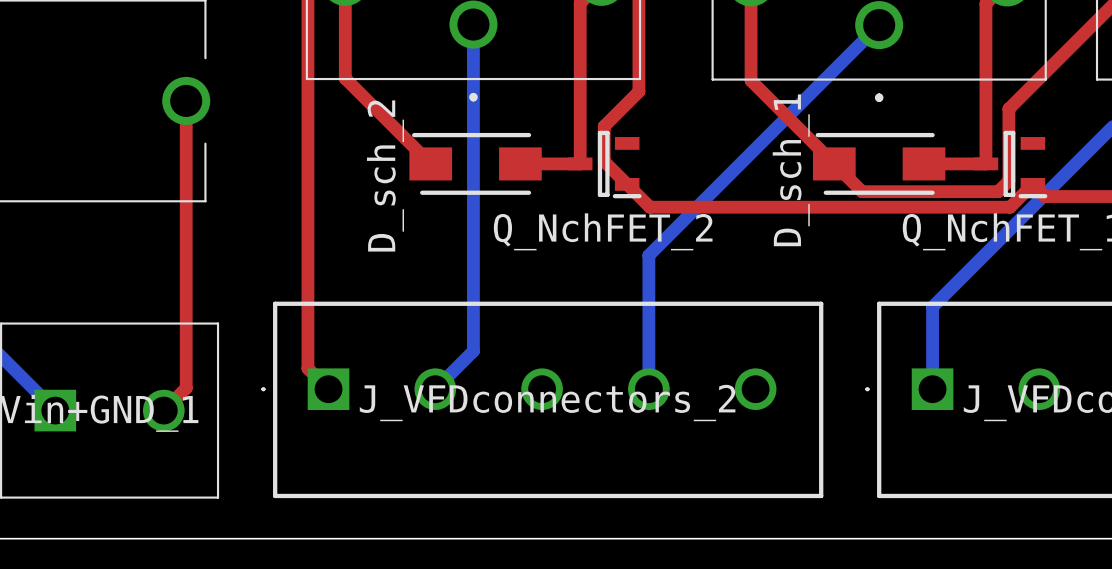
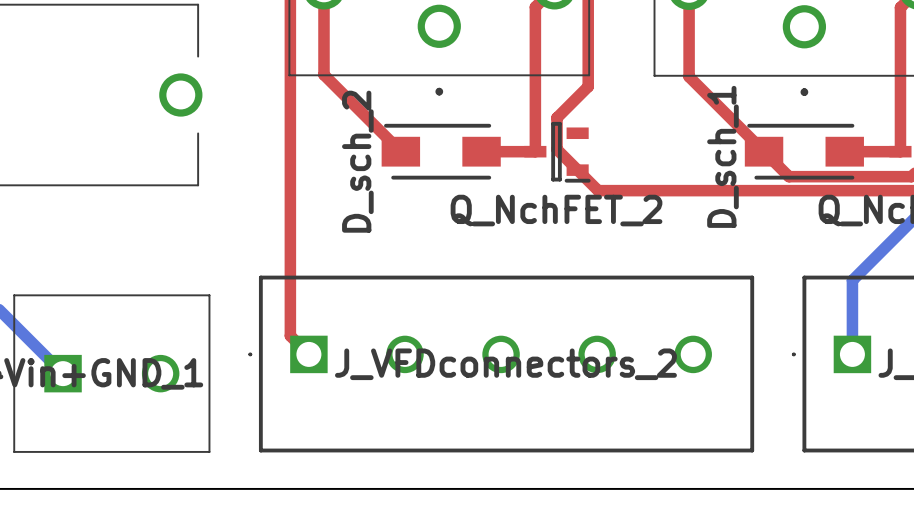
bottom track: (473, 24) (473, 351) (435, 389) -> none
bottom track: (879, 25) (648, 255) (648, 389) -> none
top track: (186, 100) (186, 388) (163, 410) -> none

